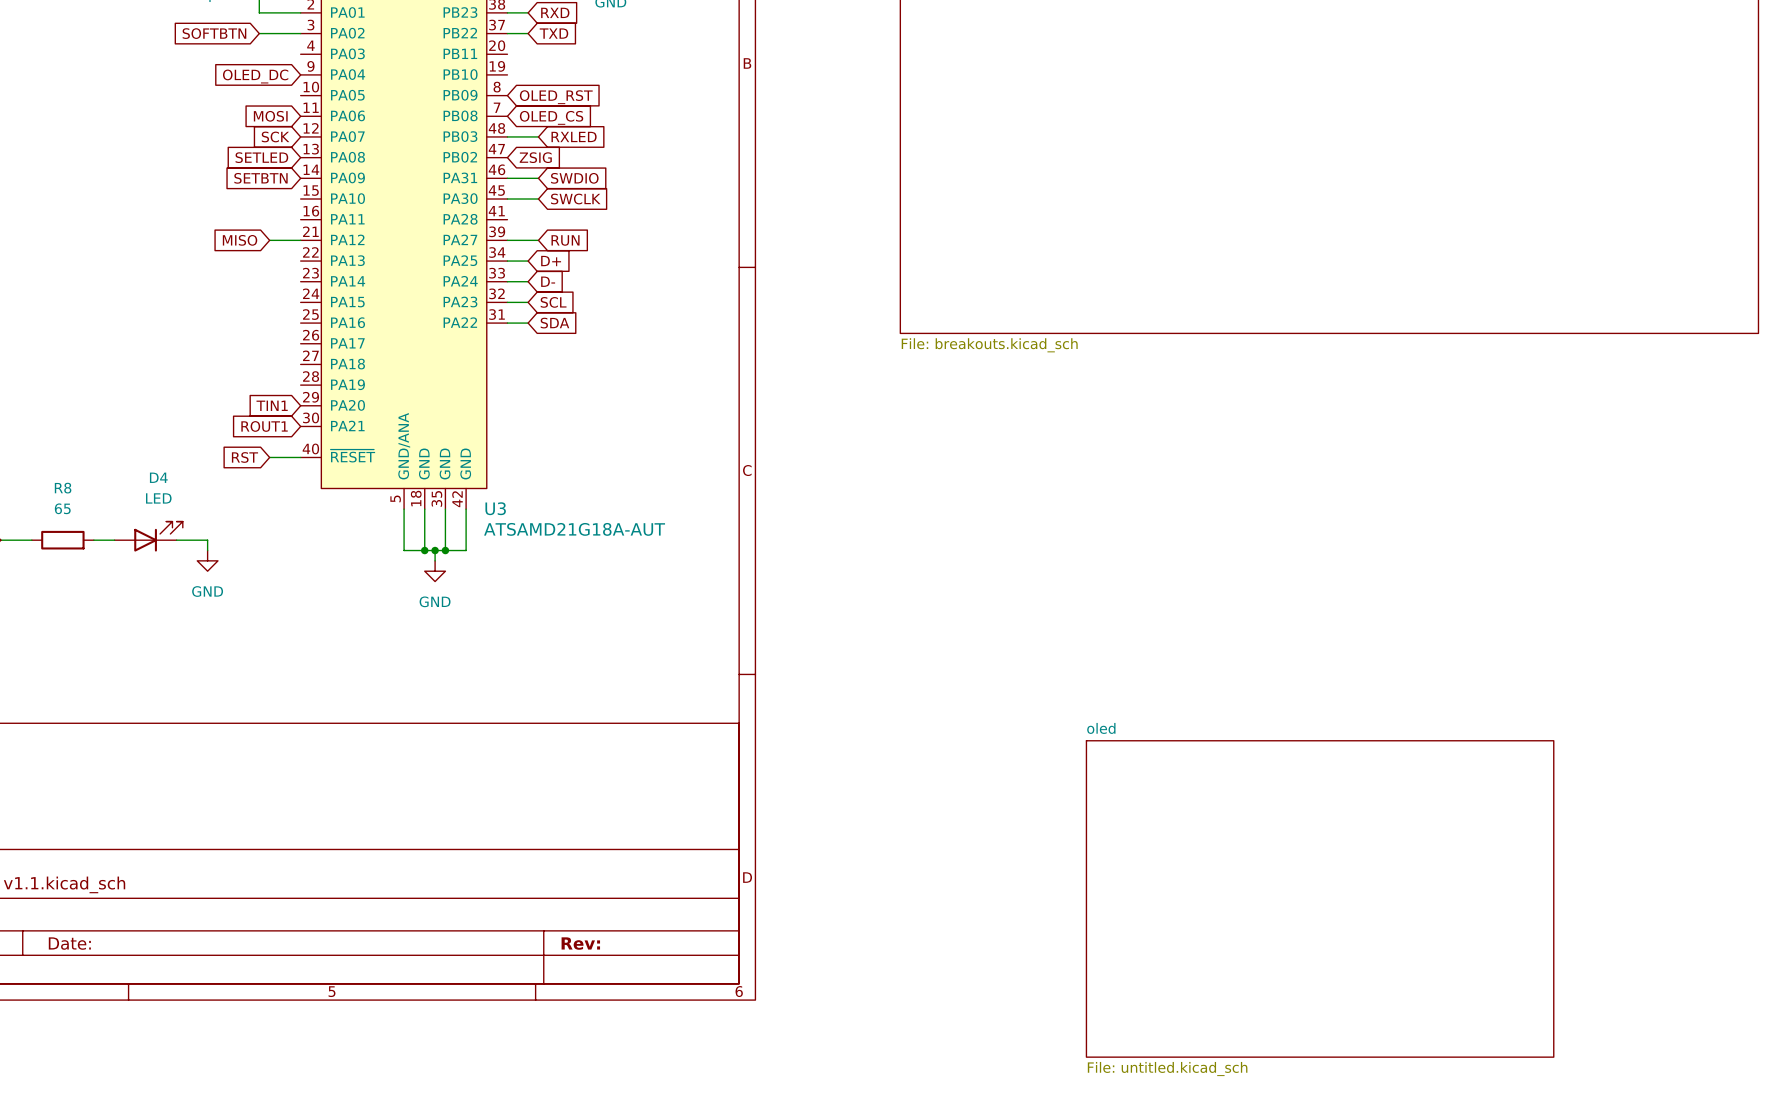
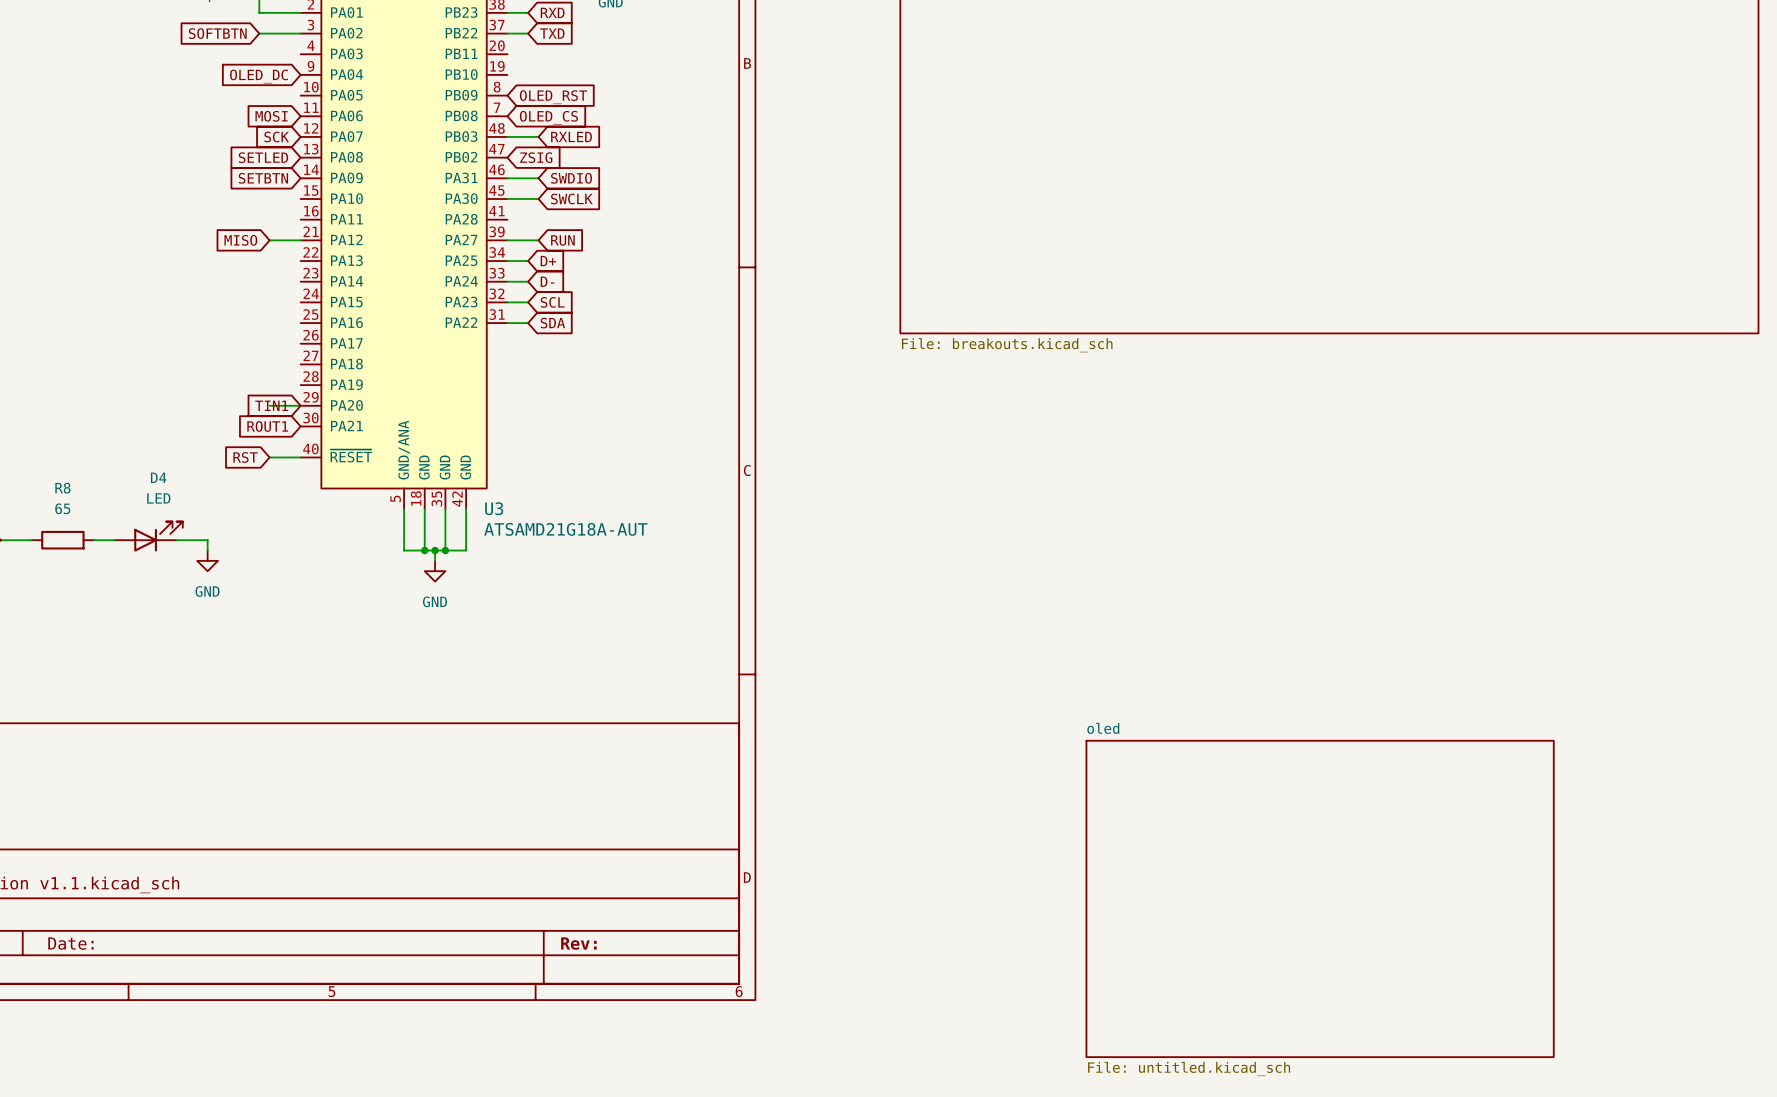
wire: none -> (269, 405) (300, 405)

